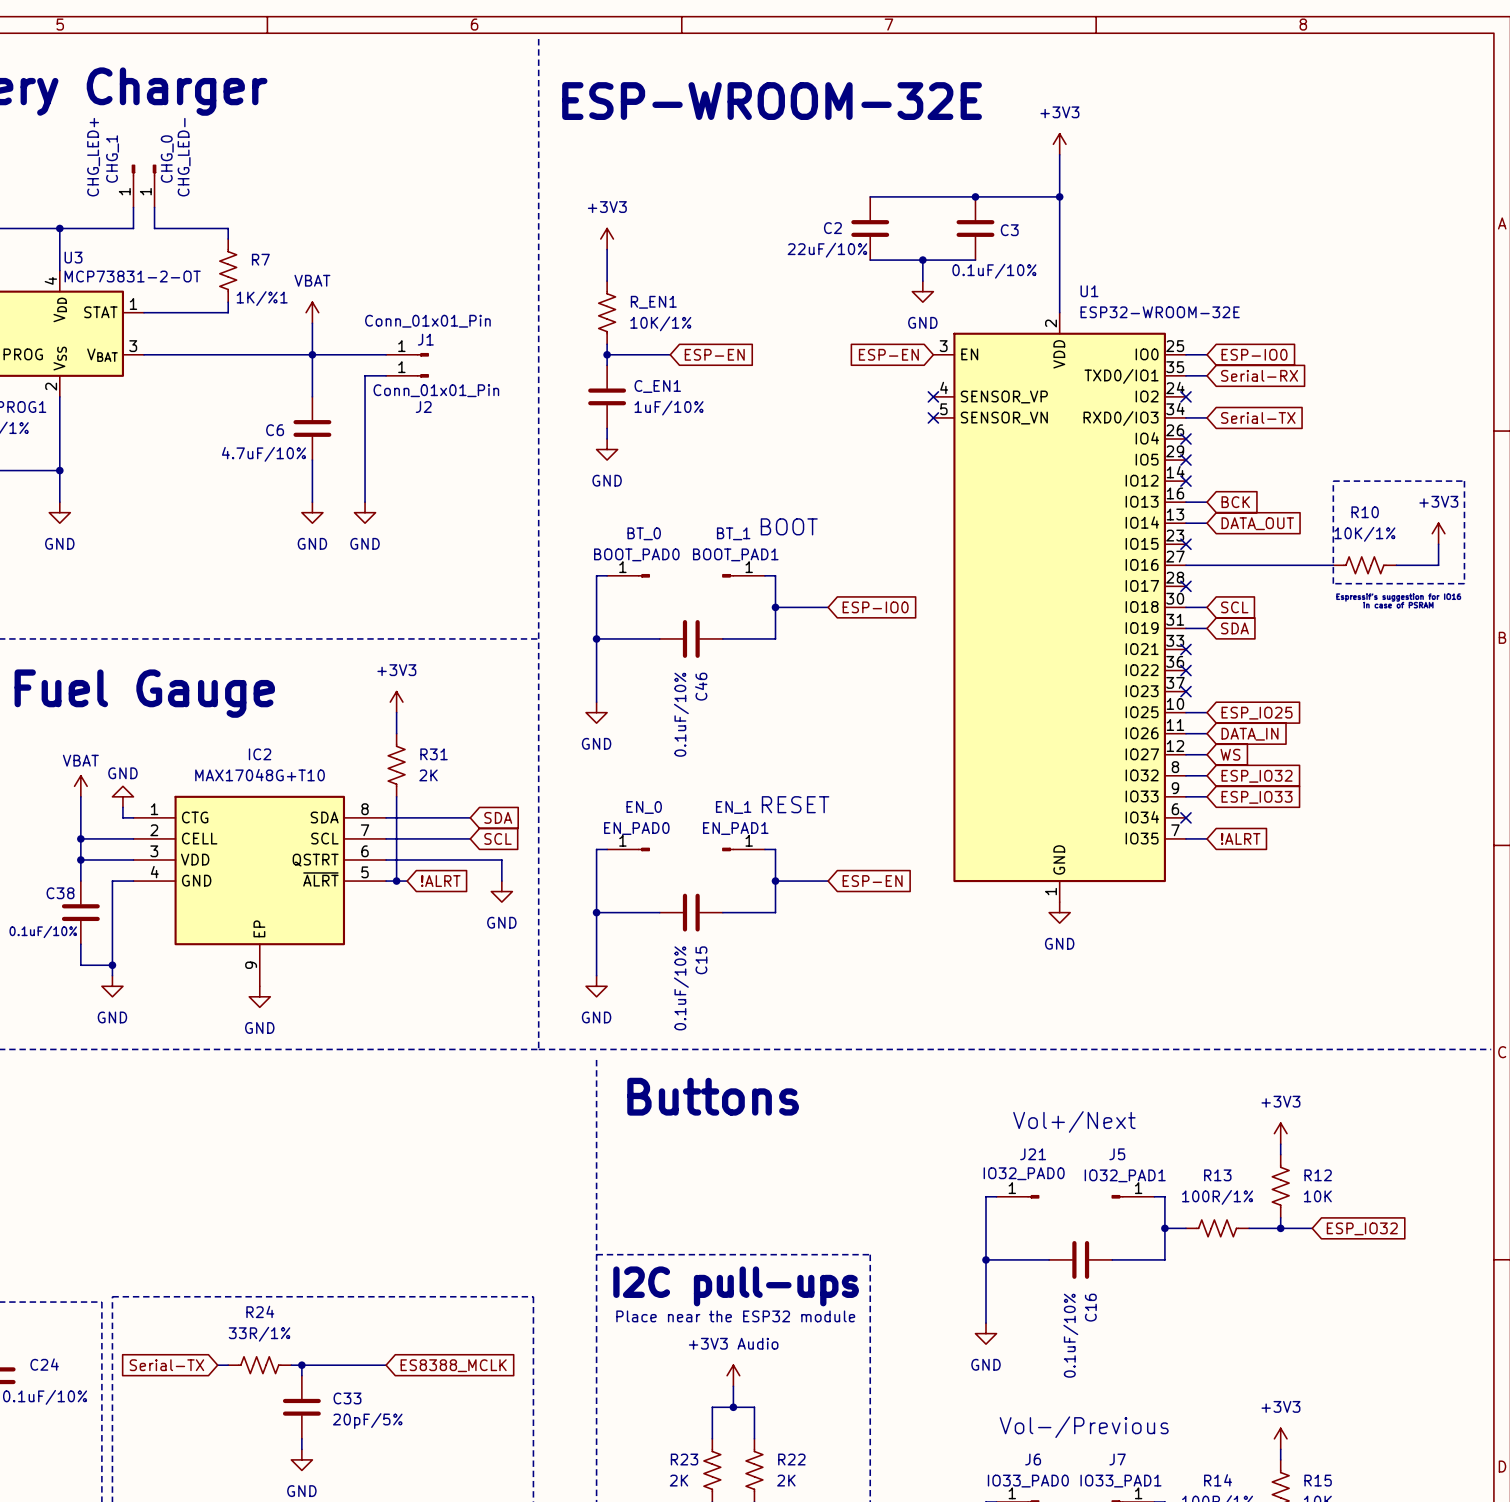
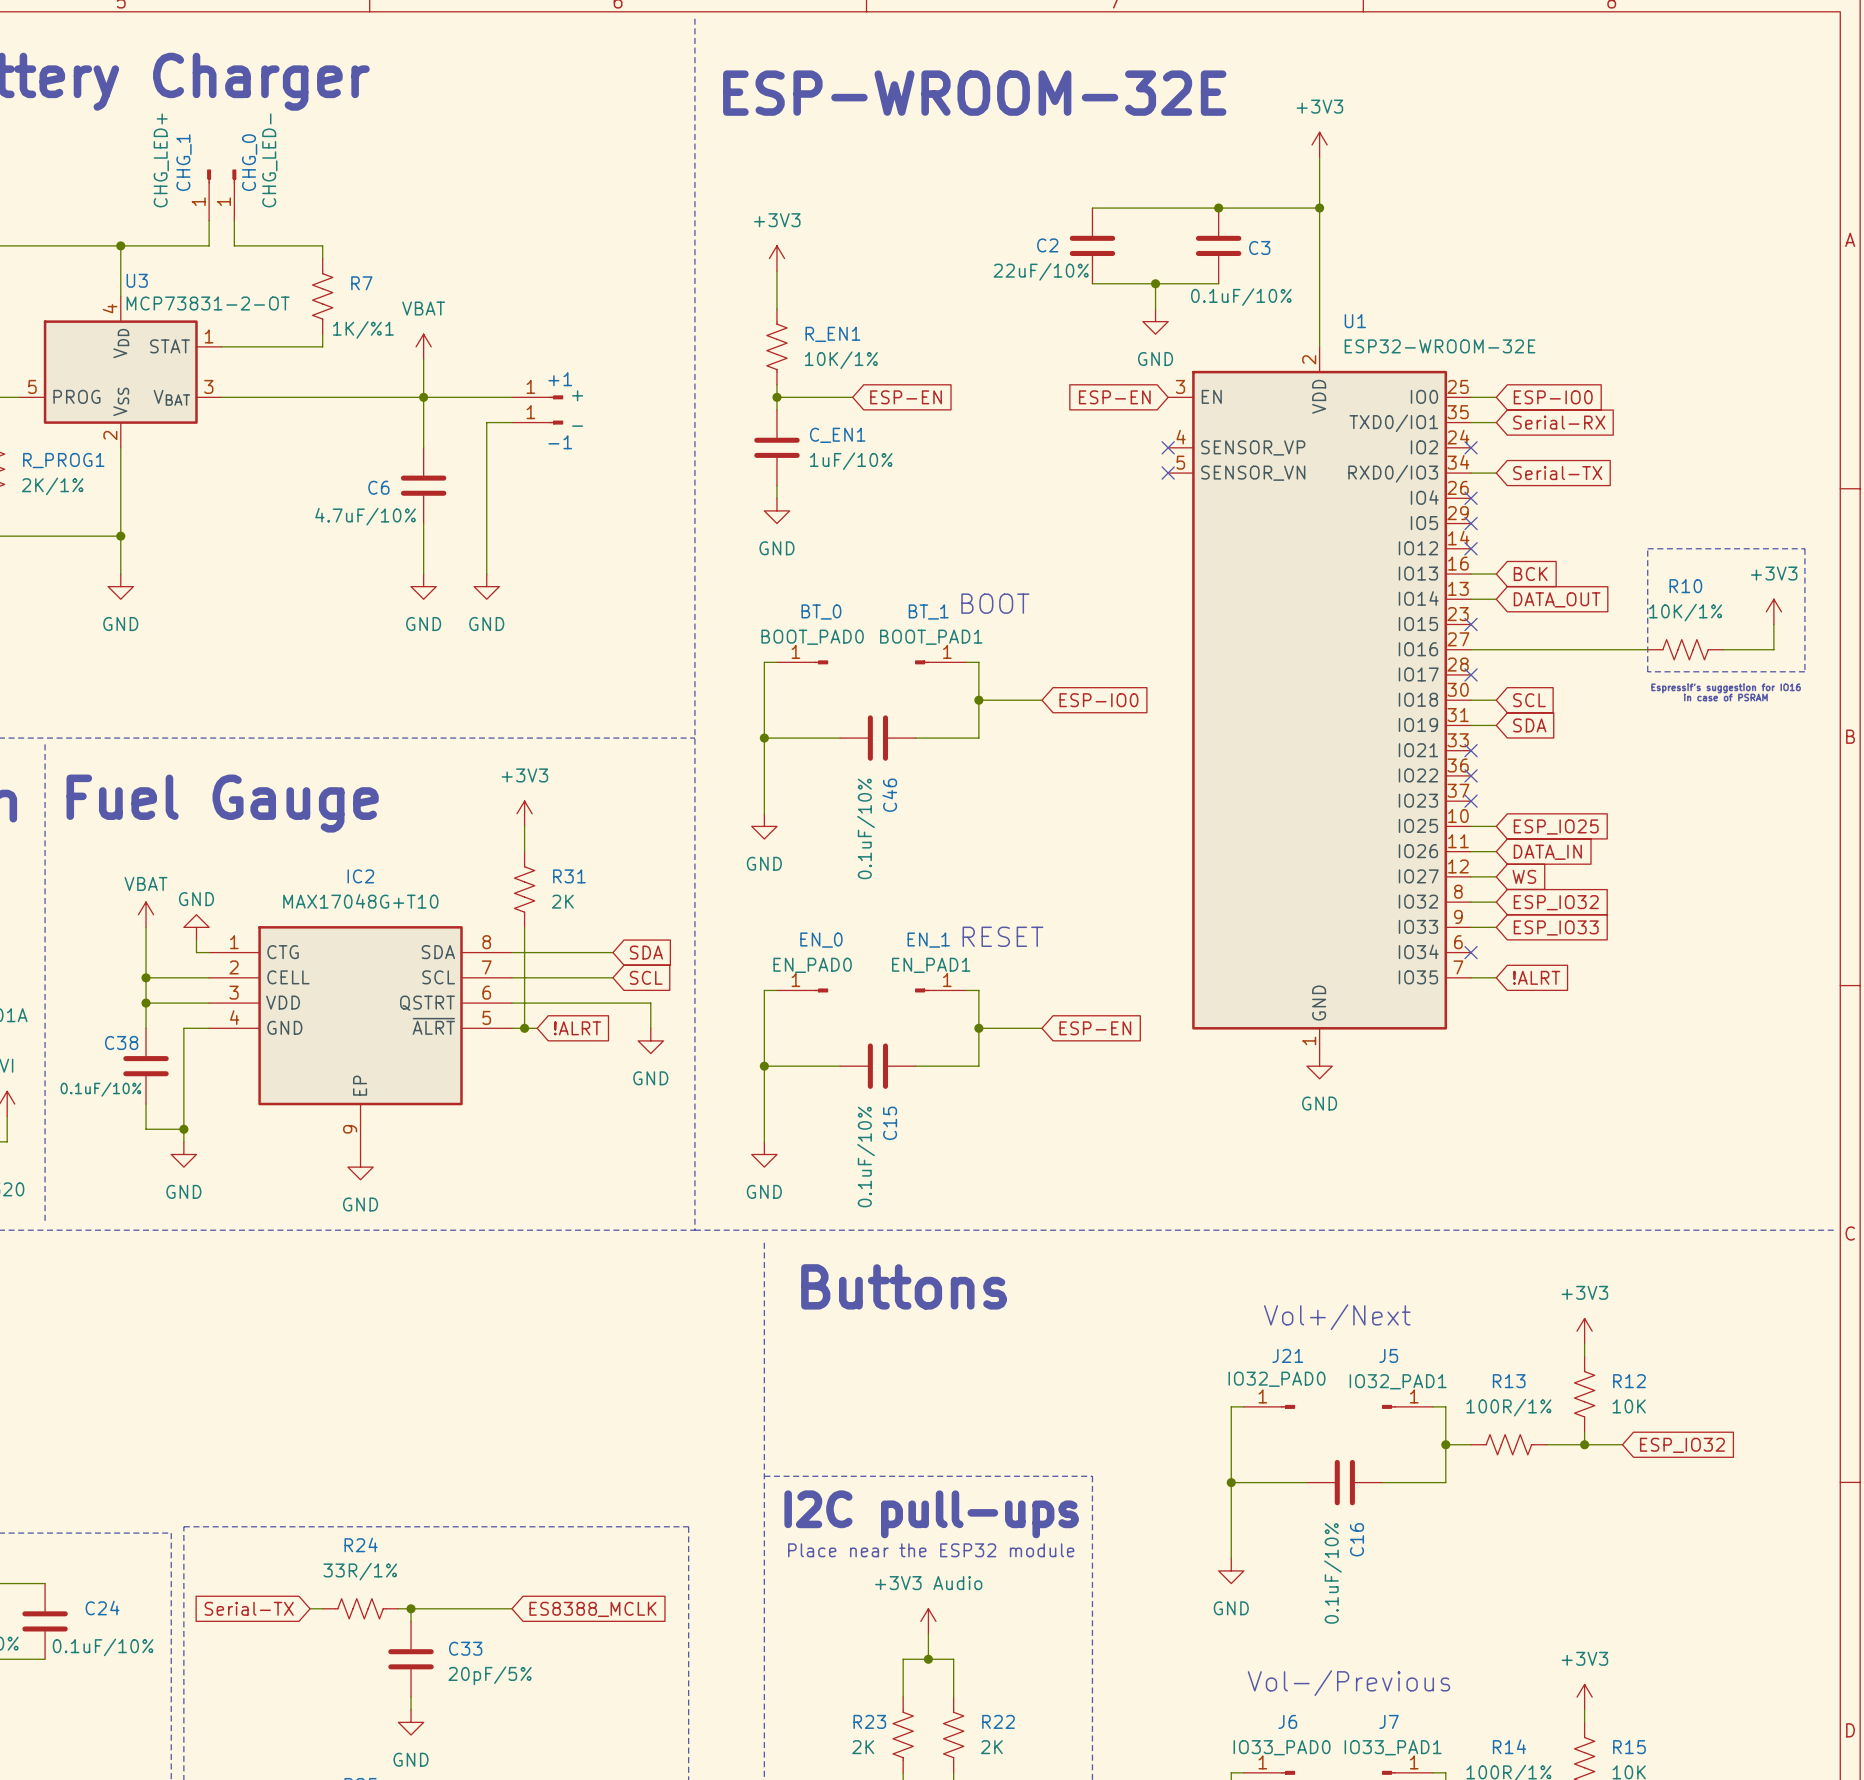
J1 value: Conn_01x01_Pin (427, 321) -> + (577, 395)
J1 name: J1 (425, 339) -> +1 (560, 379)
J2 value: Conn_01x01_Pin (436, 390) -> - (577, 426)
J2 name: J2 (423, 407) -> -1 (560, 442)

